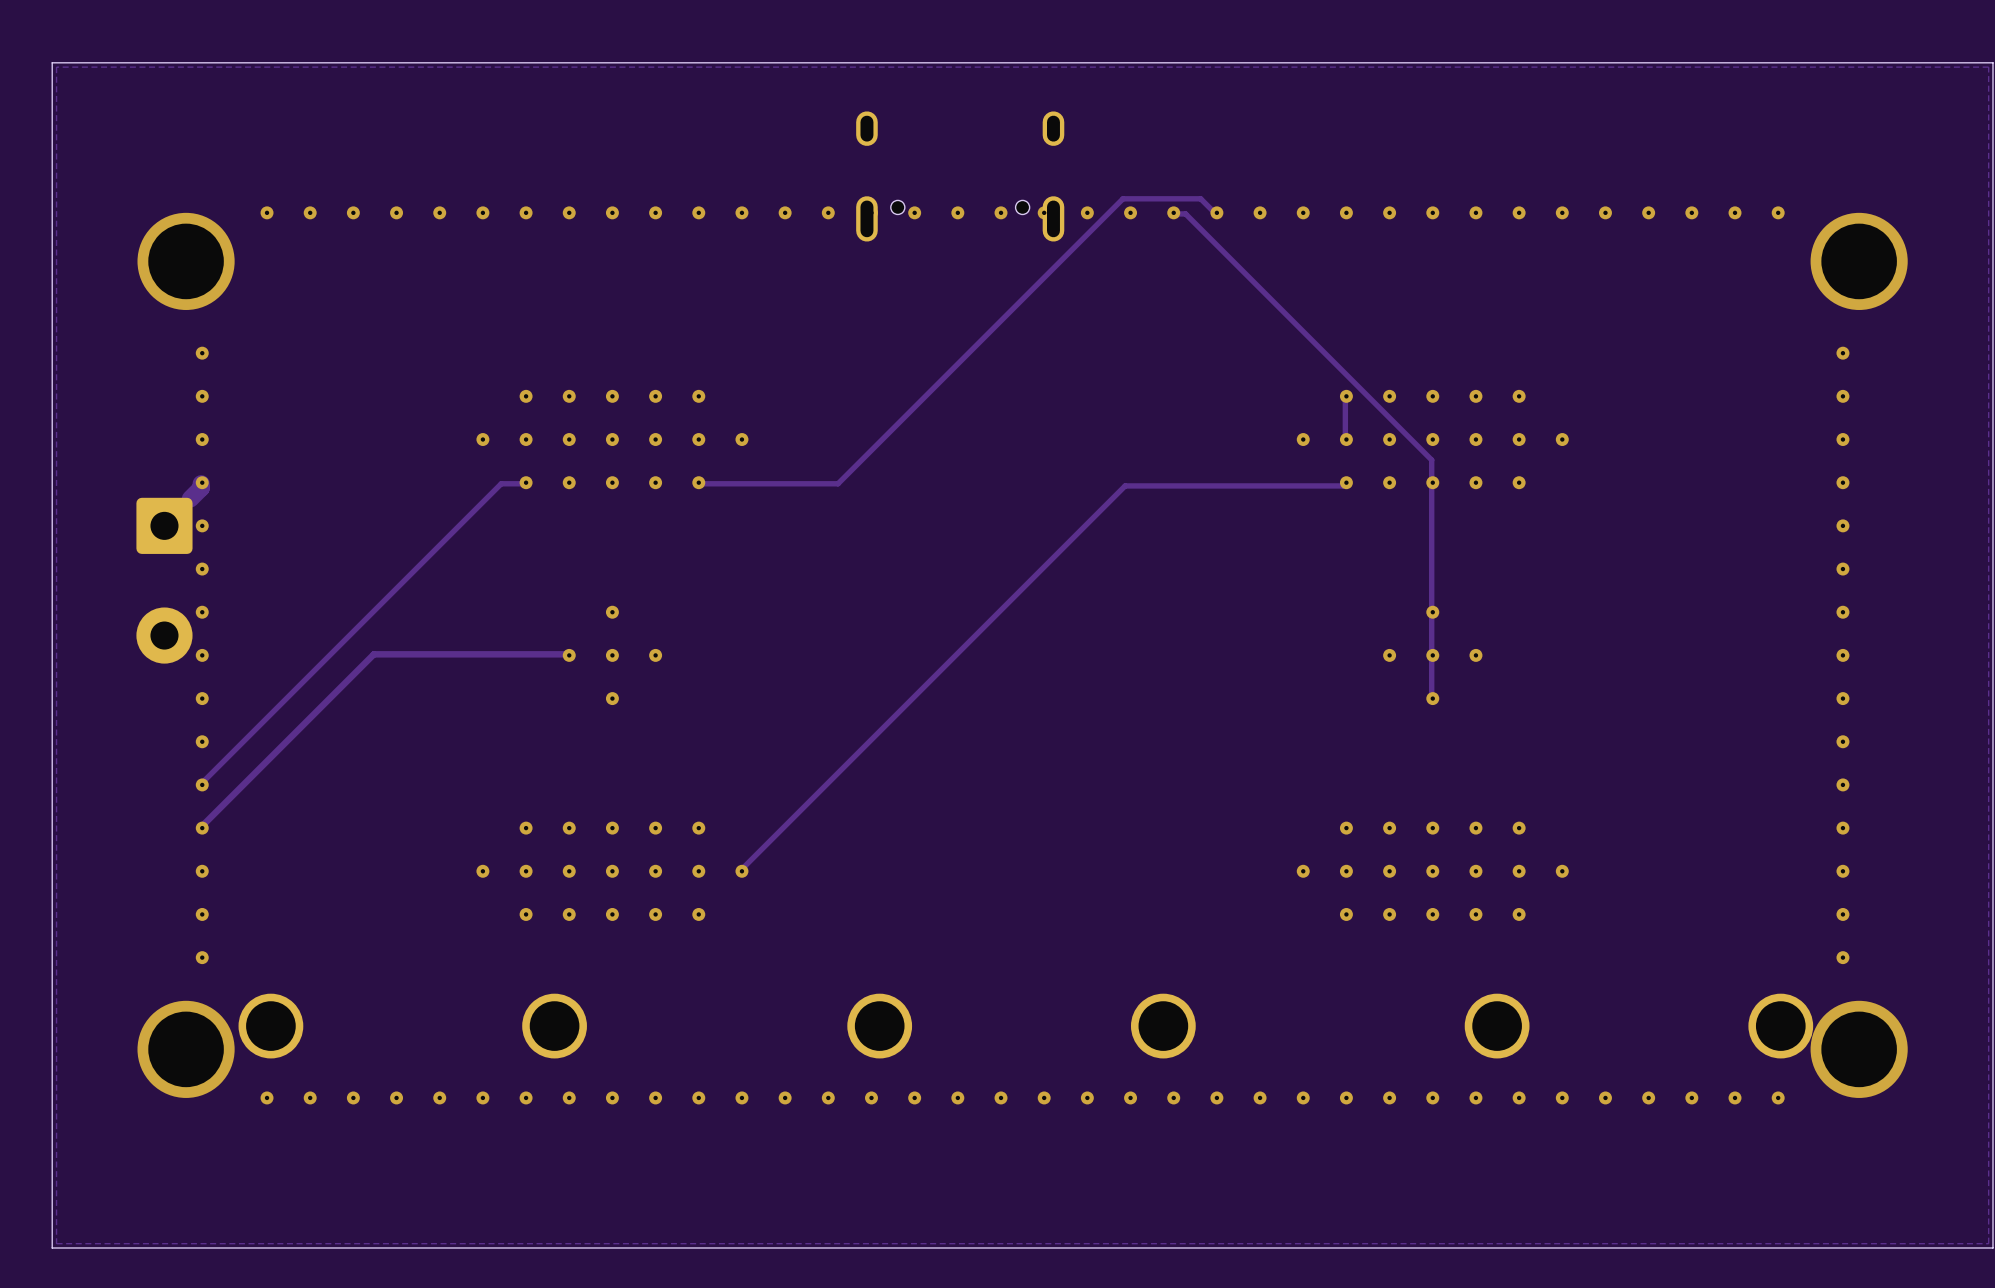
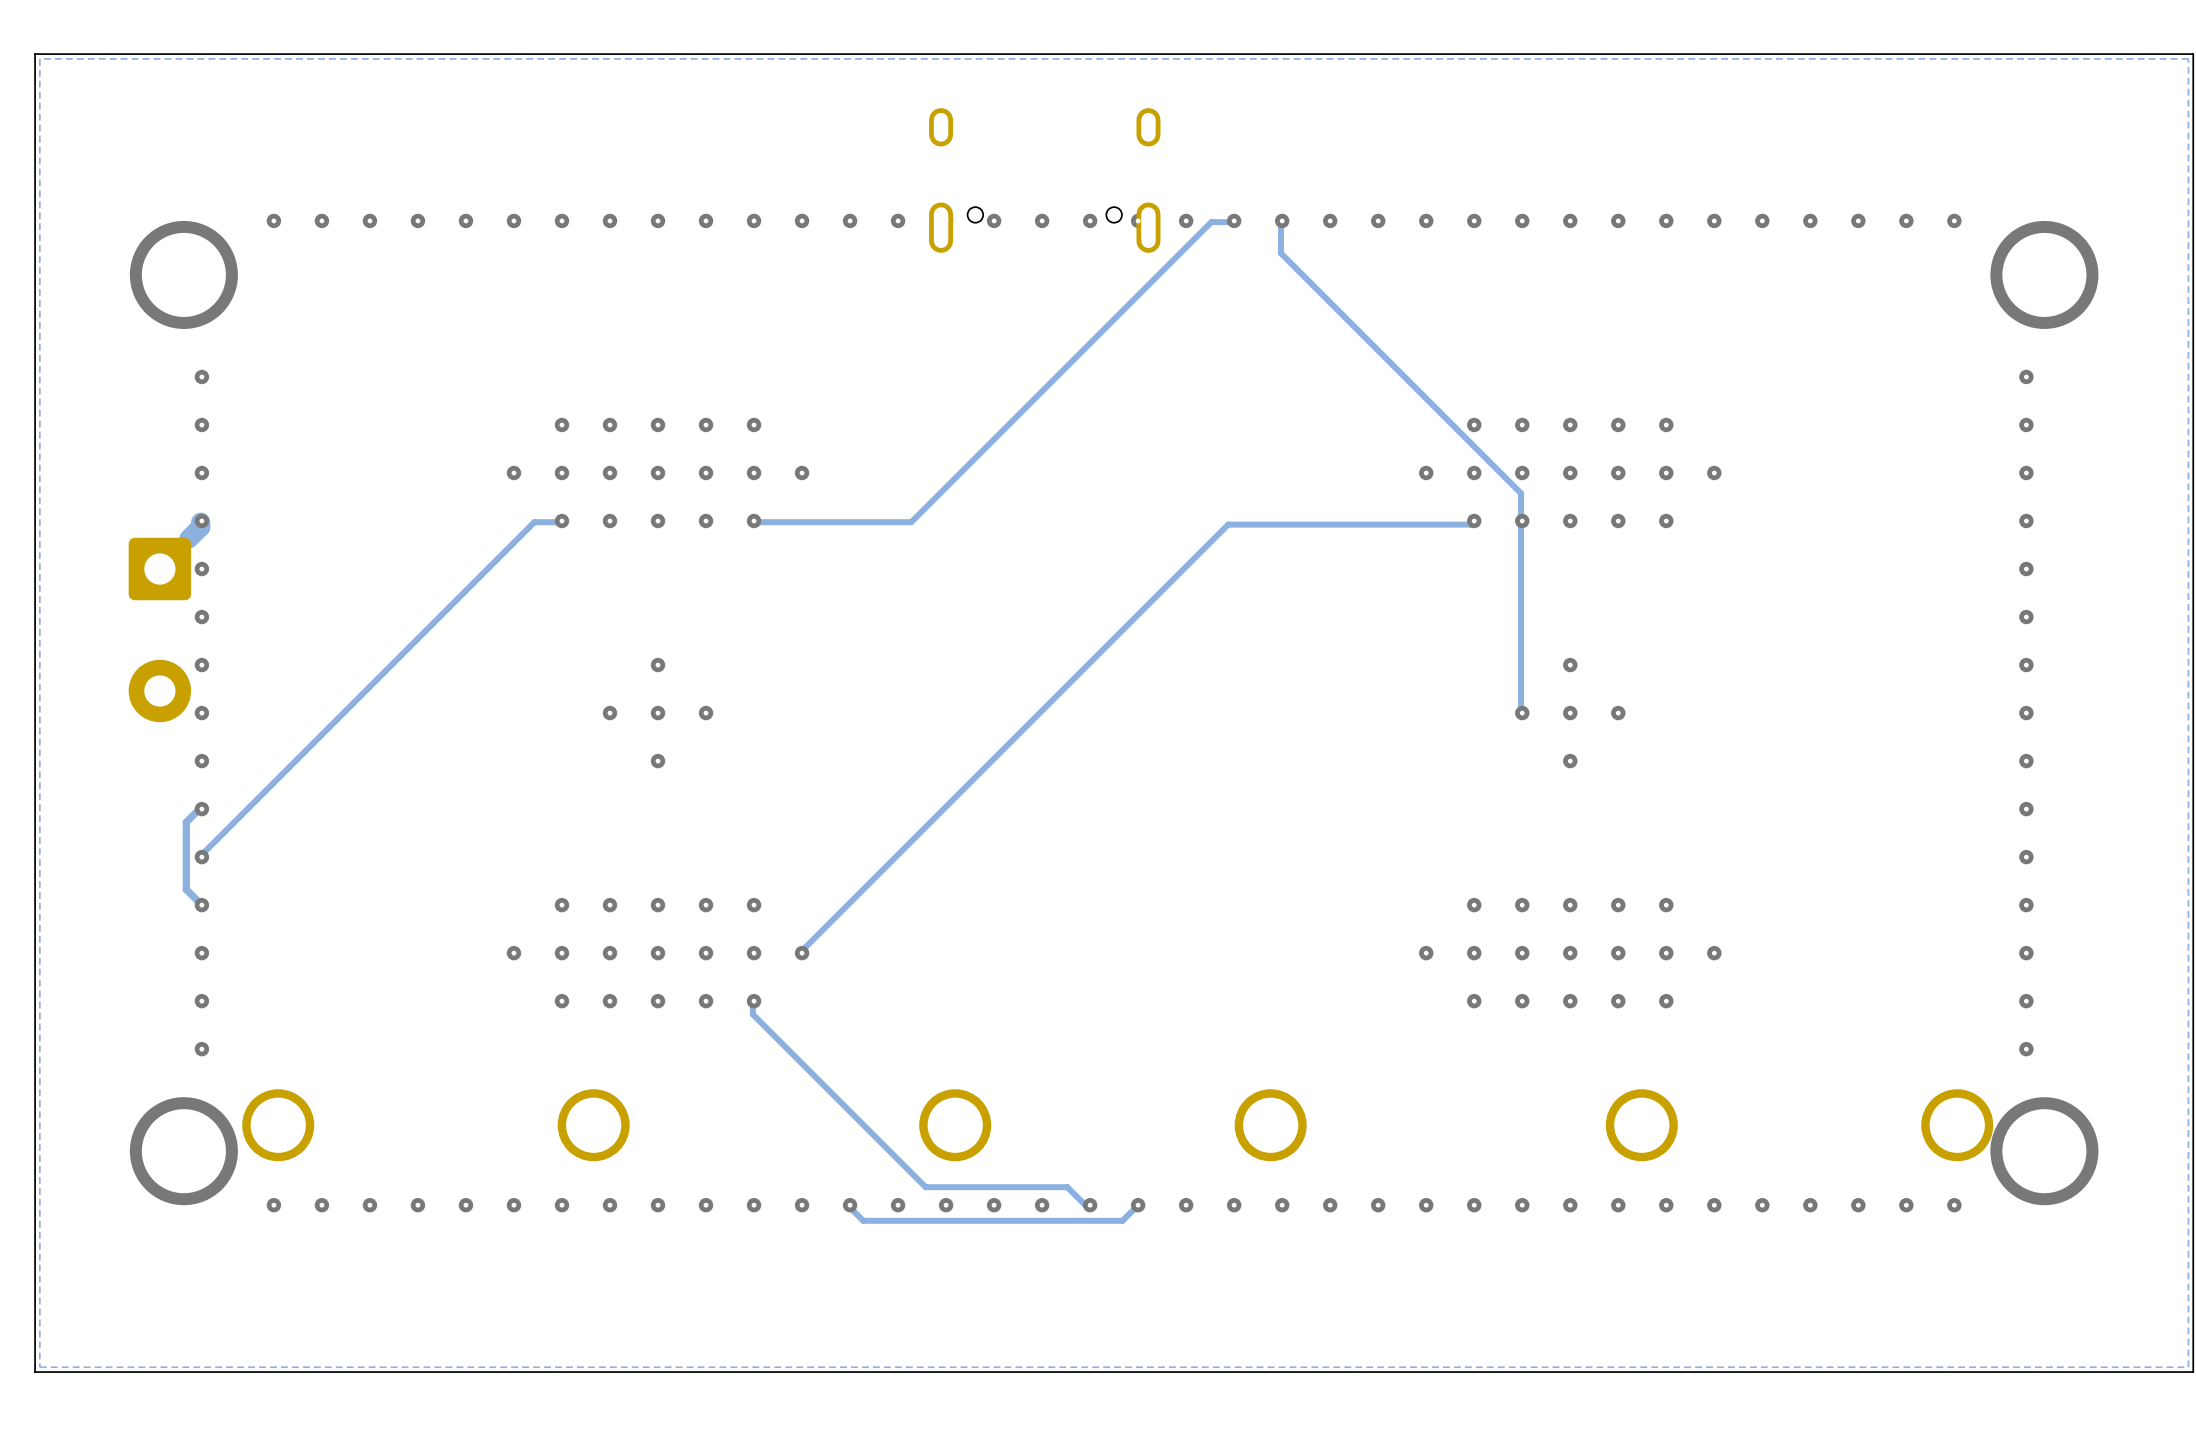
track: (1172, 213) (1185, 213) (1431, 460) (1431, 697) -> (1280, 222) (1280, 253) (1521, 493) (1521, 711)
track: (1215, 213) (1200, 198) (1122, 198) (838, 483) -> (1232, 222) (1211, 222) (911, 522) (908, 522)
track: (1345, 397) (1345, 440) -> none
track: (568, 654) (373, 654) (201, 827) -> (200, 807) (186, 822) (186, 889) (200, 903)
track: none -> (752, 999) (752, 1014) (925, 1187) (1067, 1187) (1086, 1206) (1088, 1206)
track: none -> (1136, 1206) (1122, 1220) (863, 1220) (848, 1206)

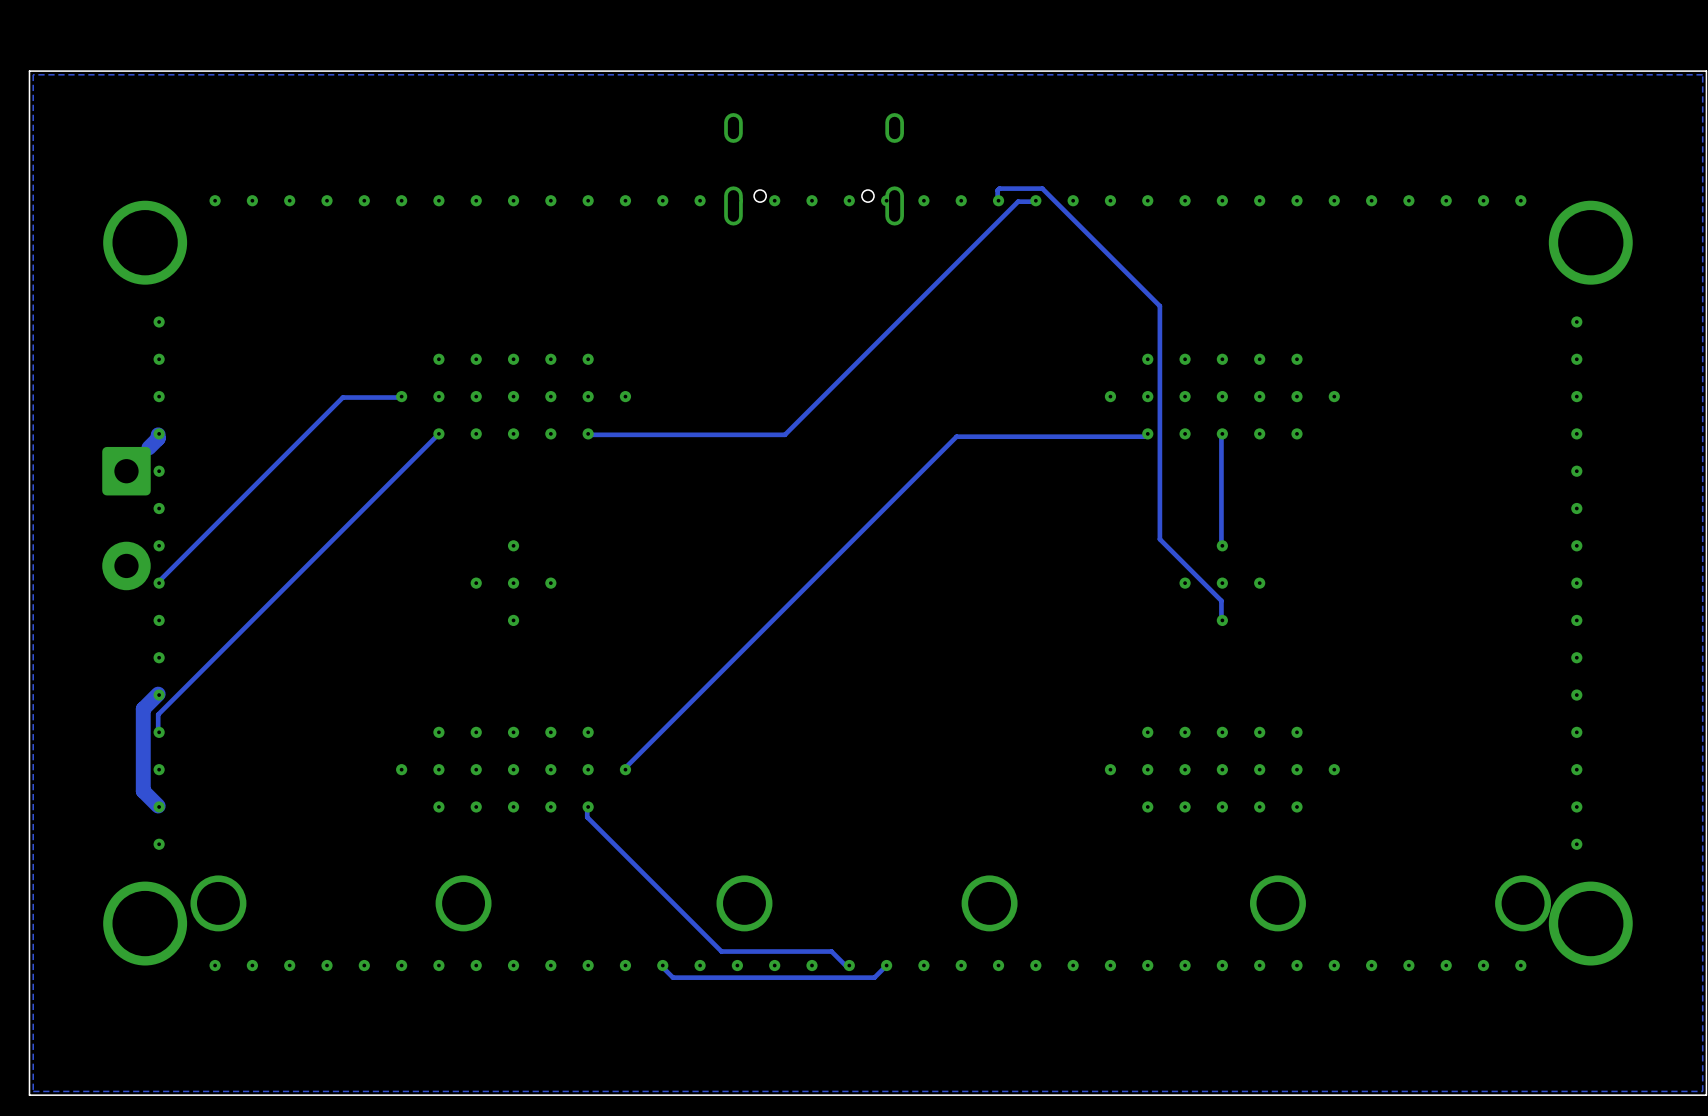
track: (1232, 222) (1211, 222) (911, 522) -> (1034, 201) (1018, 201) (784, 434) (710, 434)
track: (1280, 222) (1280, 253) (1521, 493) (1521, 711) -> (997, 201) (997, 190) (999, 188) (1042, 188) (1159, 306) (1159, 539) (1221, 600) (1221, 619)
track: none -> (400, 397) (342, 397) (158, 582)
track: (560, 522) (534, 522) (200, 855) -> (438, 434) (158, 714) (158, 731)
track: none -> (1221, 434) (1221, 546)
track: (200, 807) (186, 822) (186, 889) (200, 903) -> none
track: none -> (159, 695) (143, 709) (143, 791) (158, 806)

